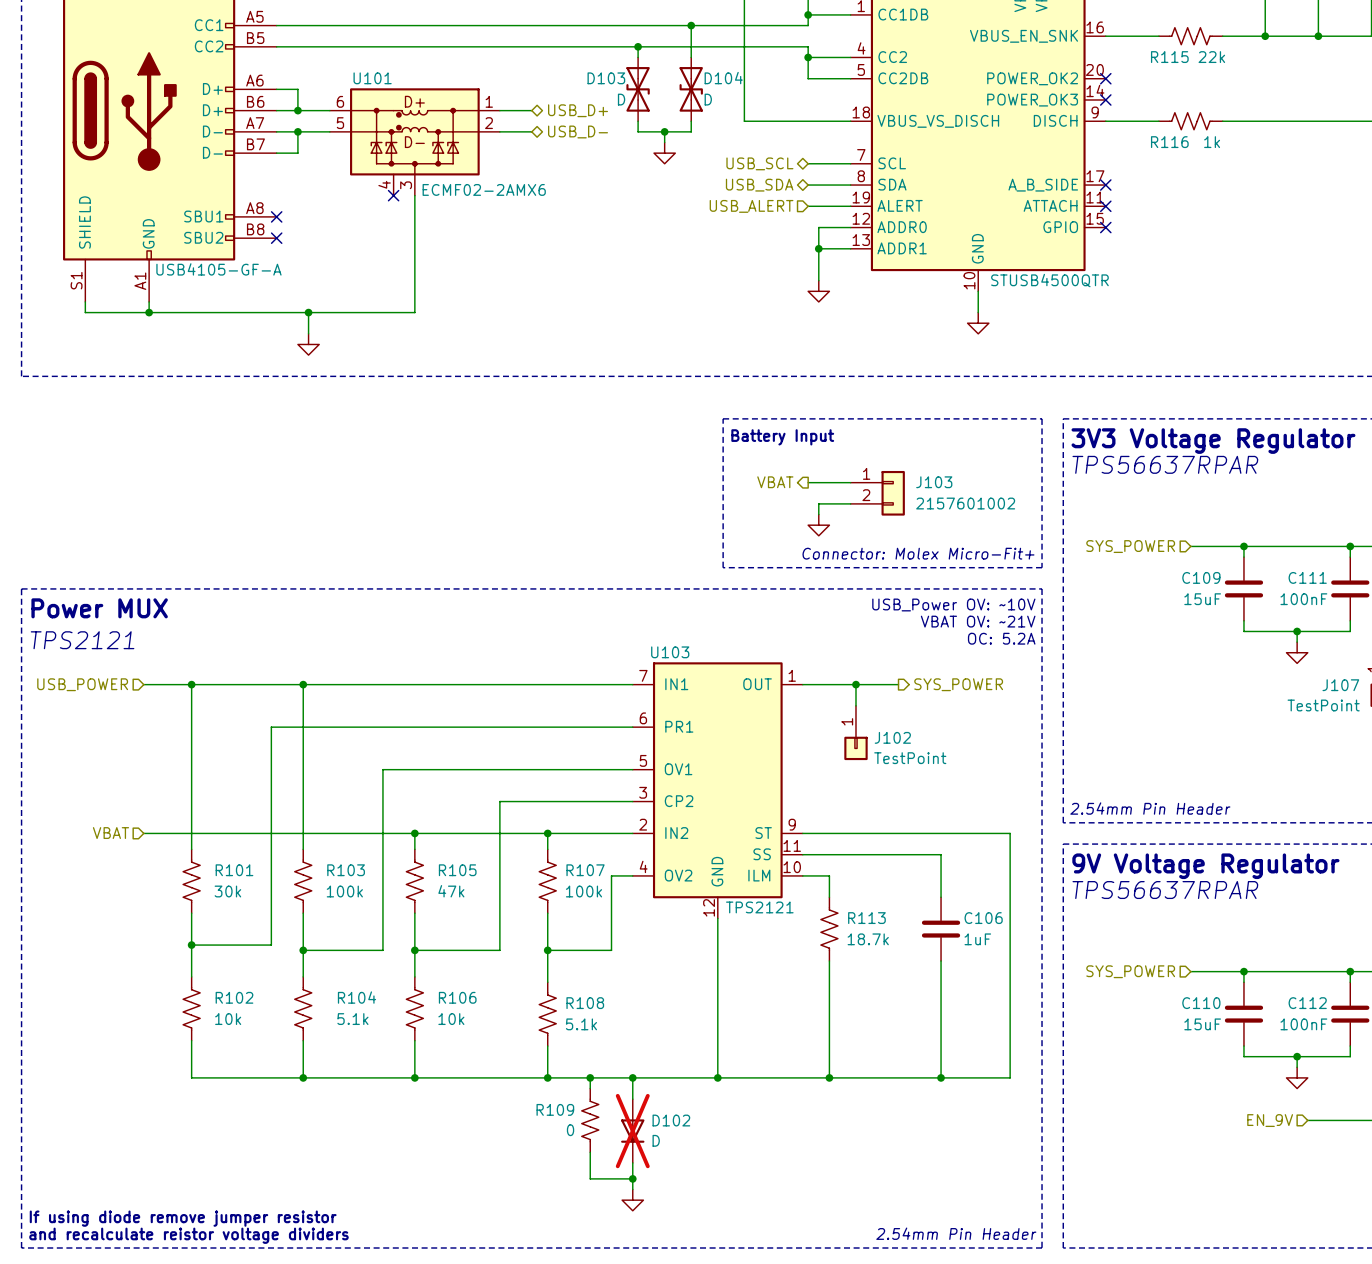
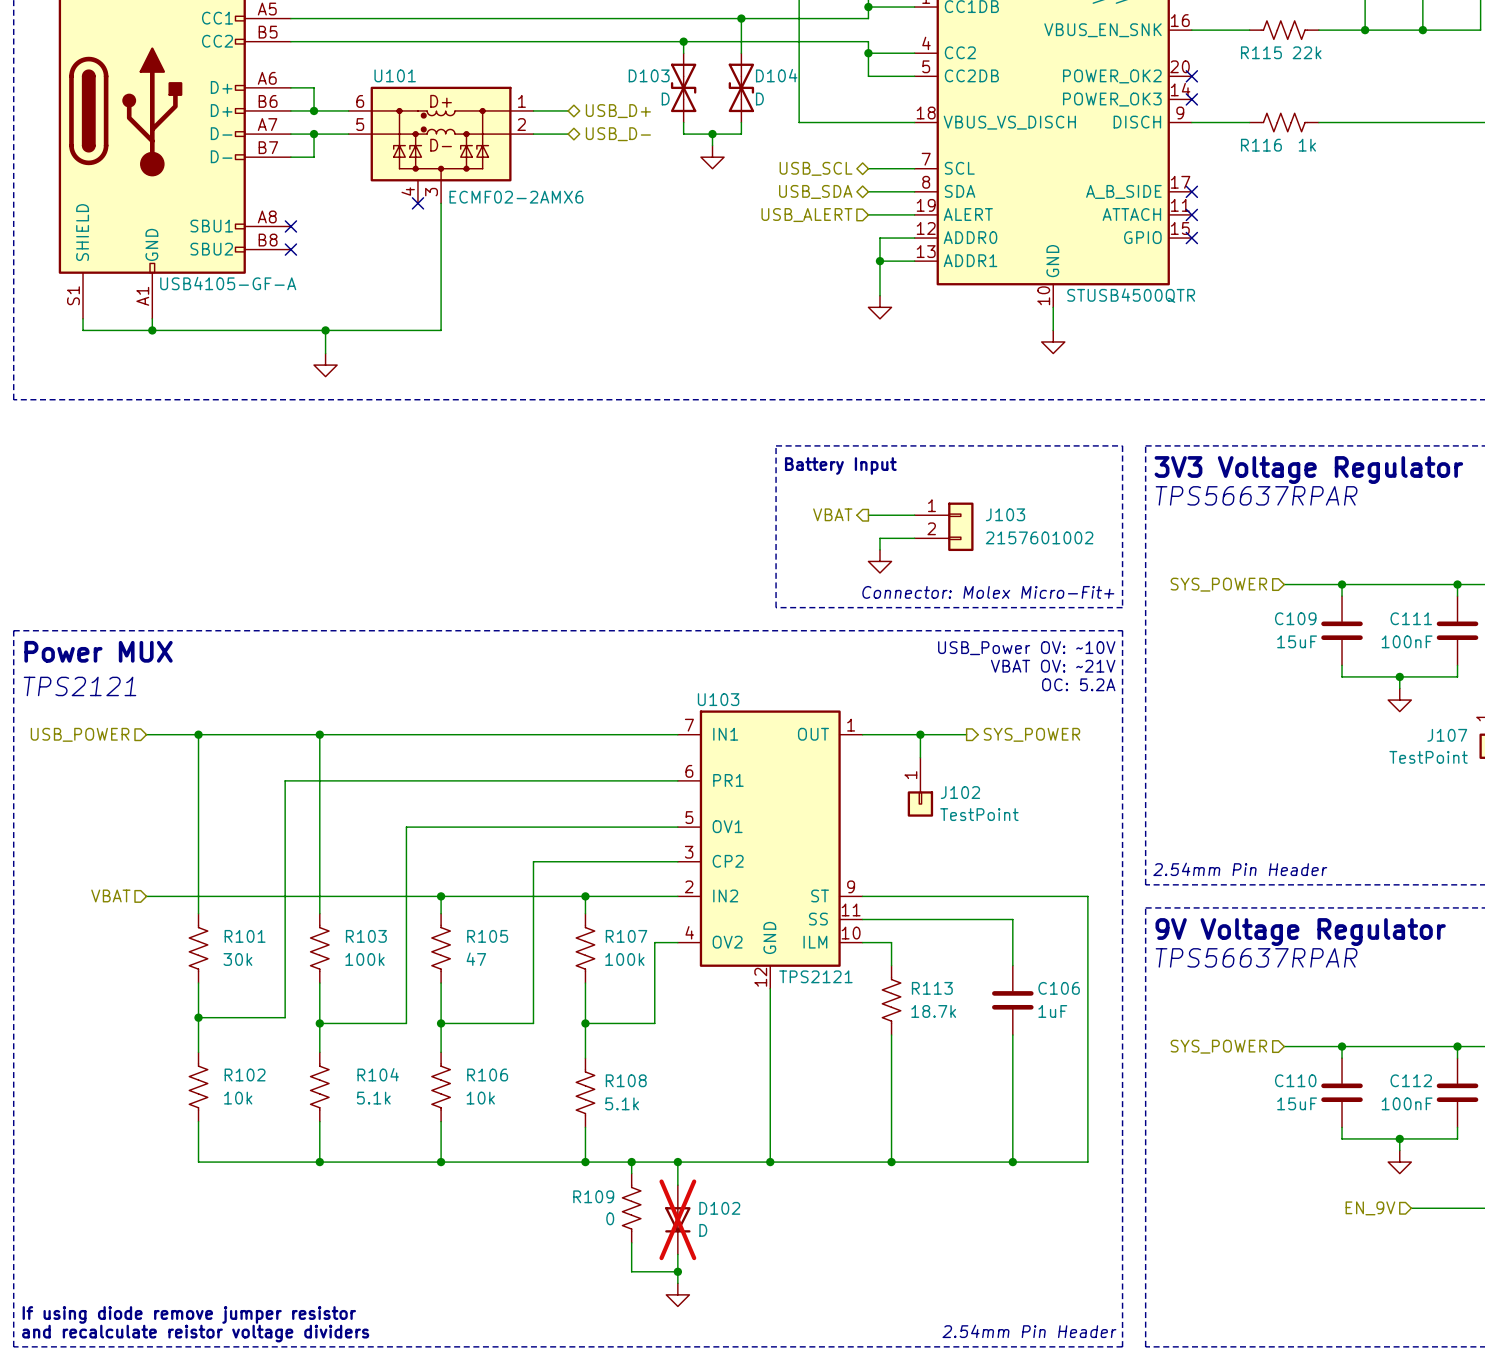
R105 value: 47k (451, 891) -> 47 (476, 959)

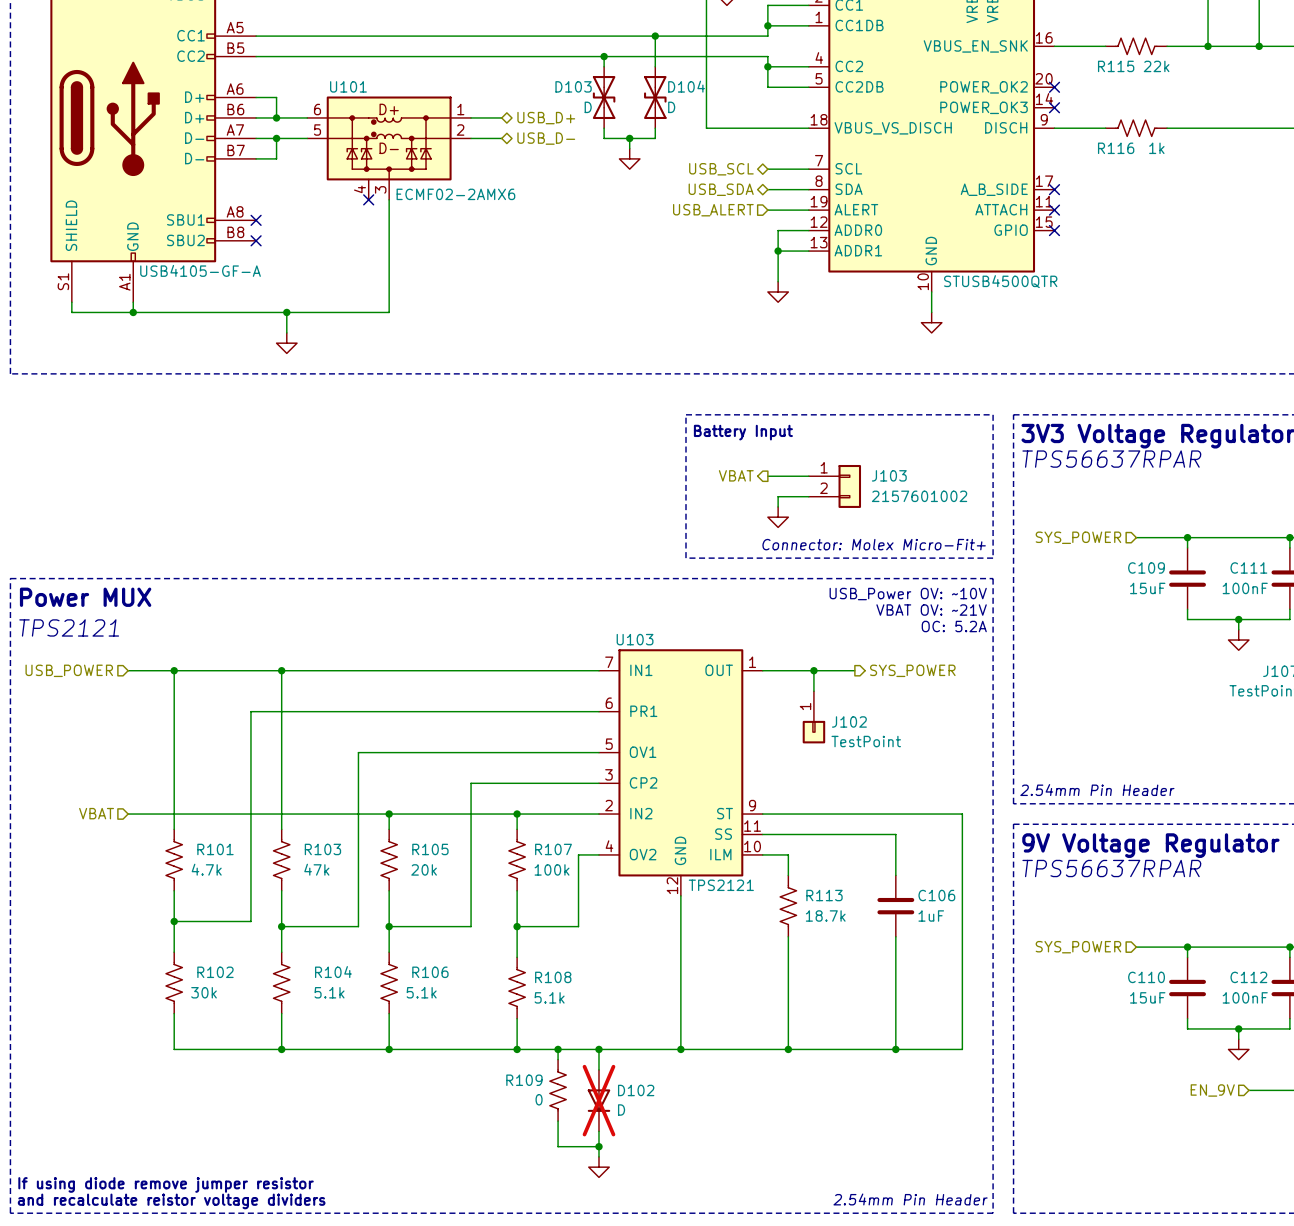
R101 value: 30k (237, 959) -> 4.7k (206, 869)
R103 value: 100k (364, 959) -> 47k (316, 869)
R105 value: 47 (476, 959) -> 20k (424, 869)
R102 value: 10k (238, 1098) -> 30k (204, 992)
R106 value: 10k (480, 1098) -> 5.1k (421, 992)

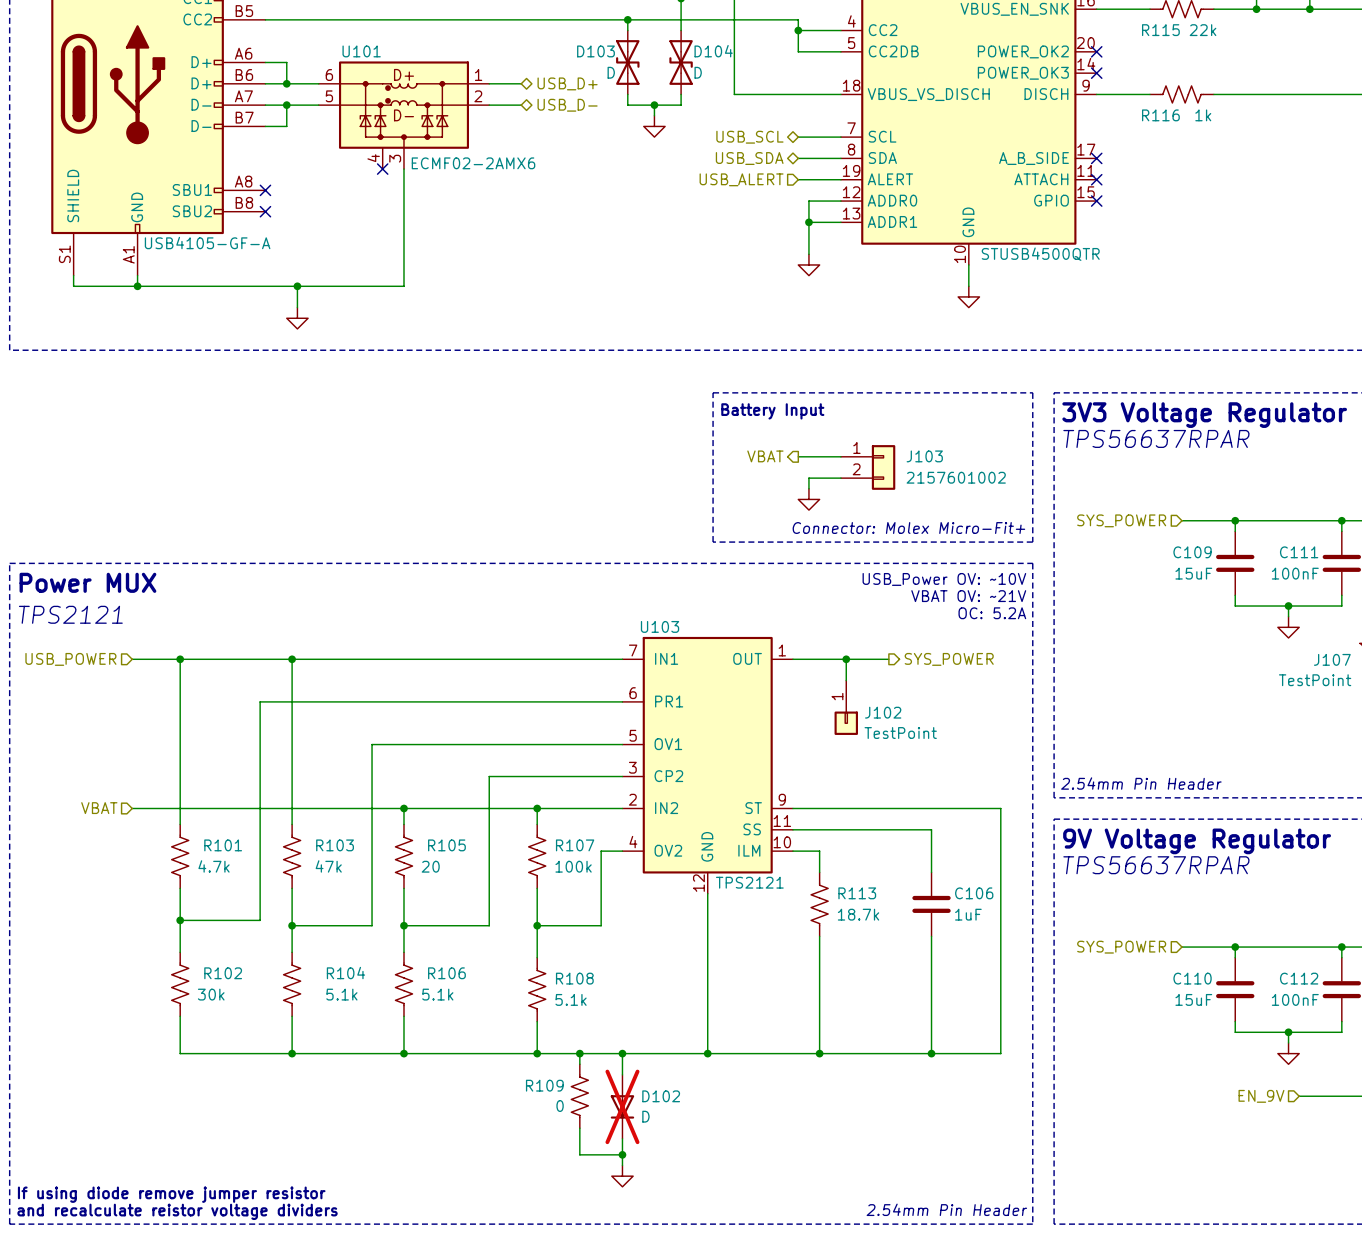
R105 value: 20k (424, 869) -> 20 (430, 866)

